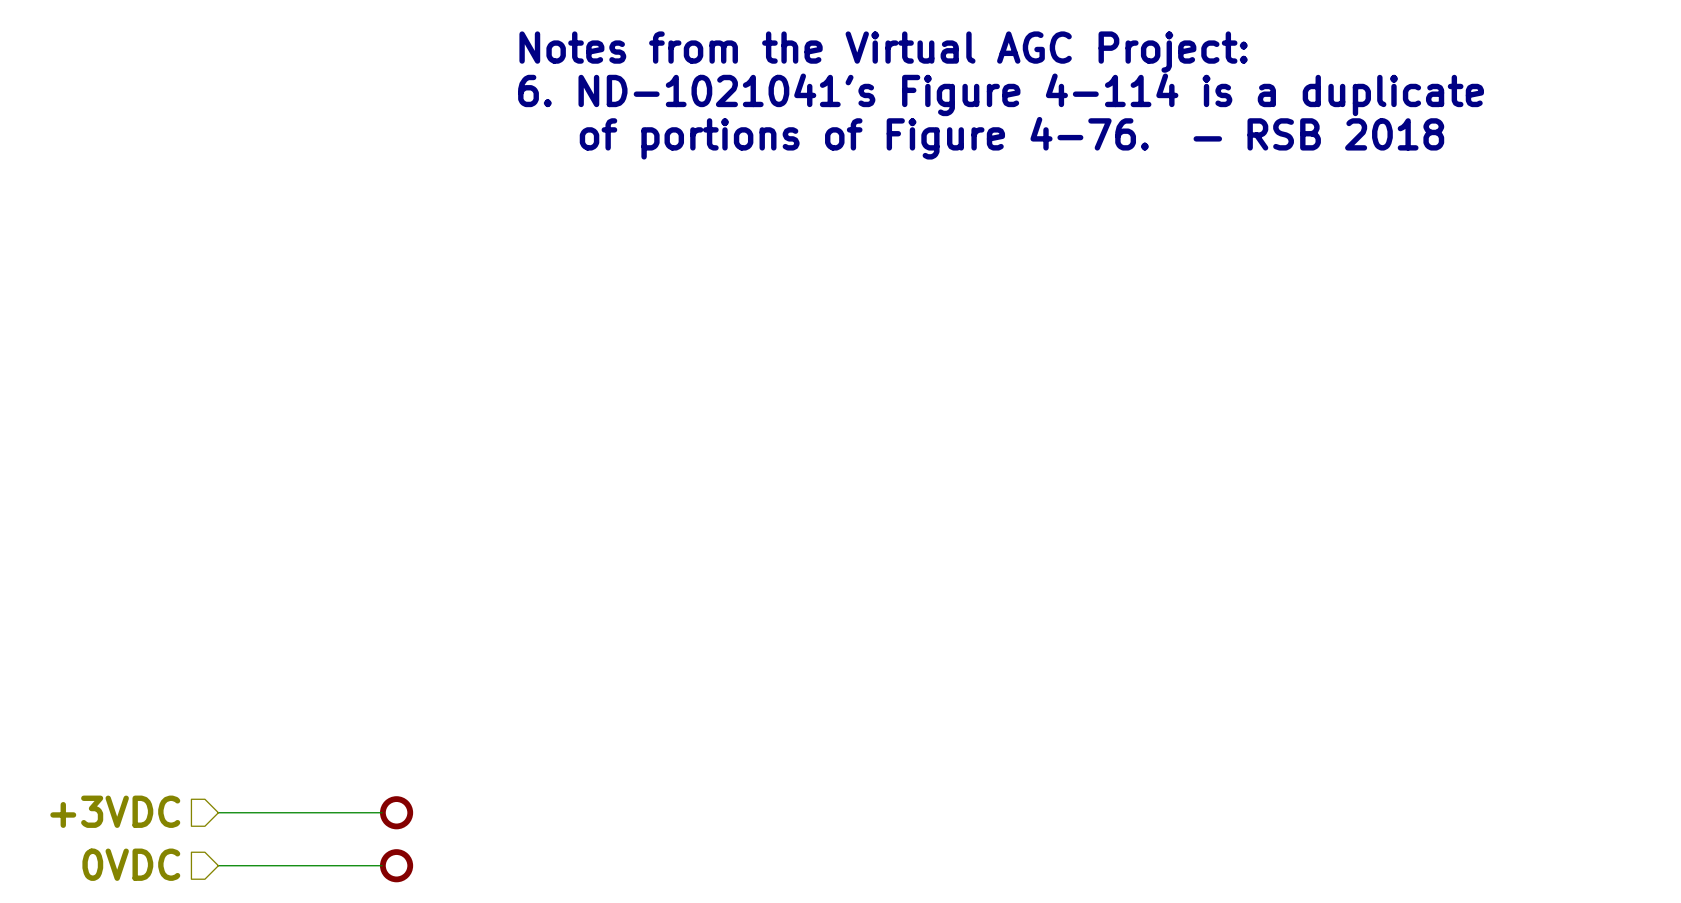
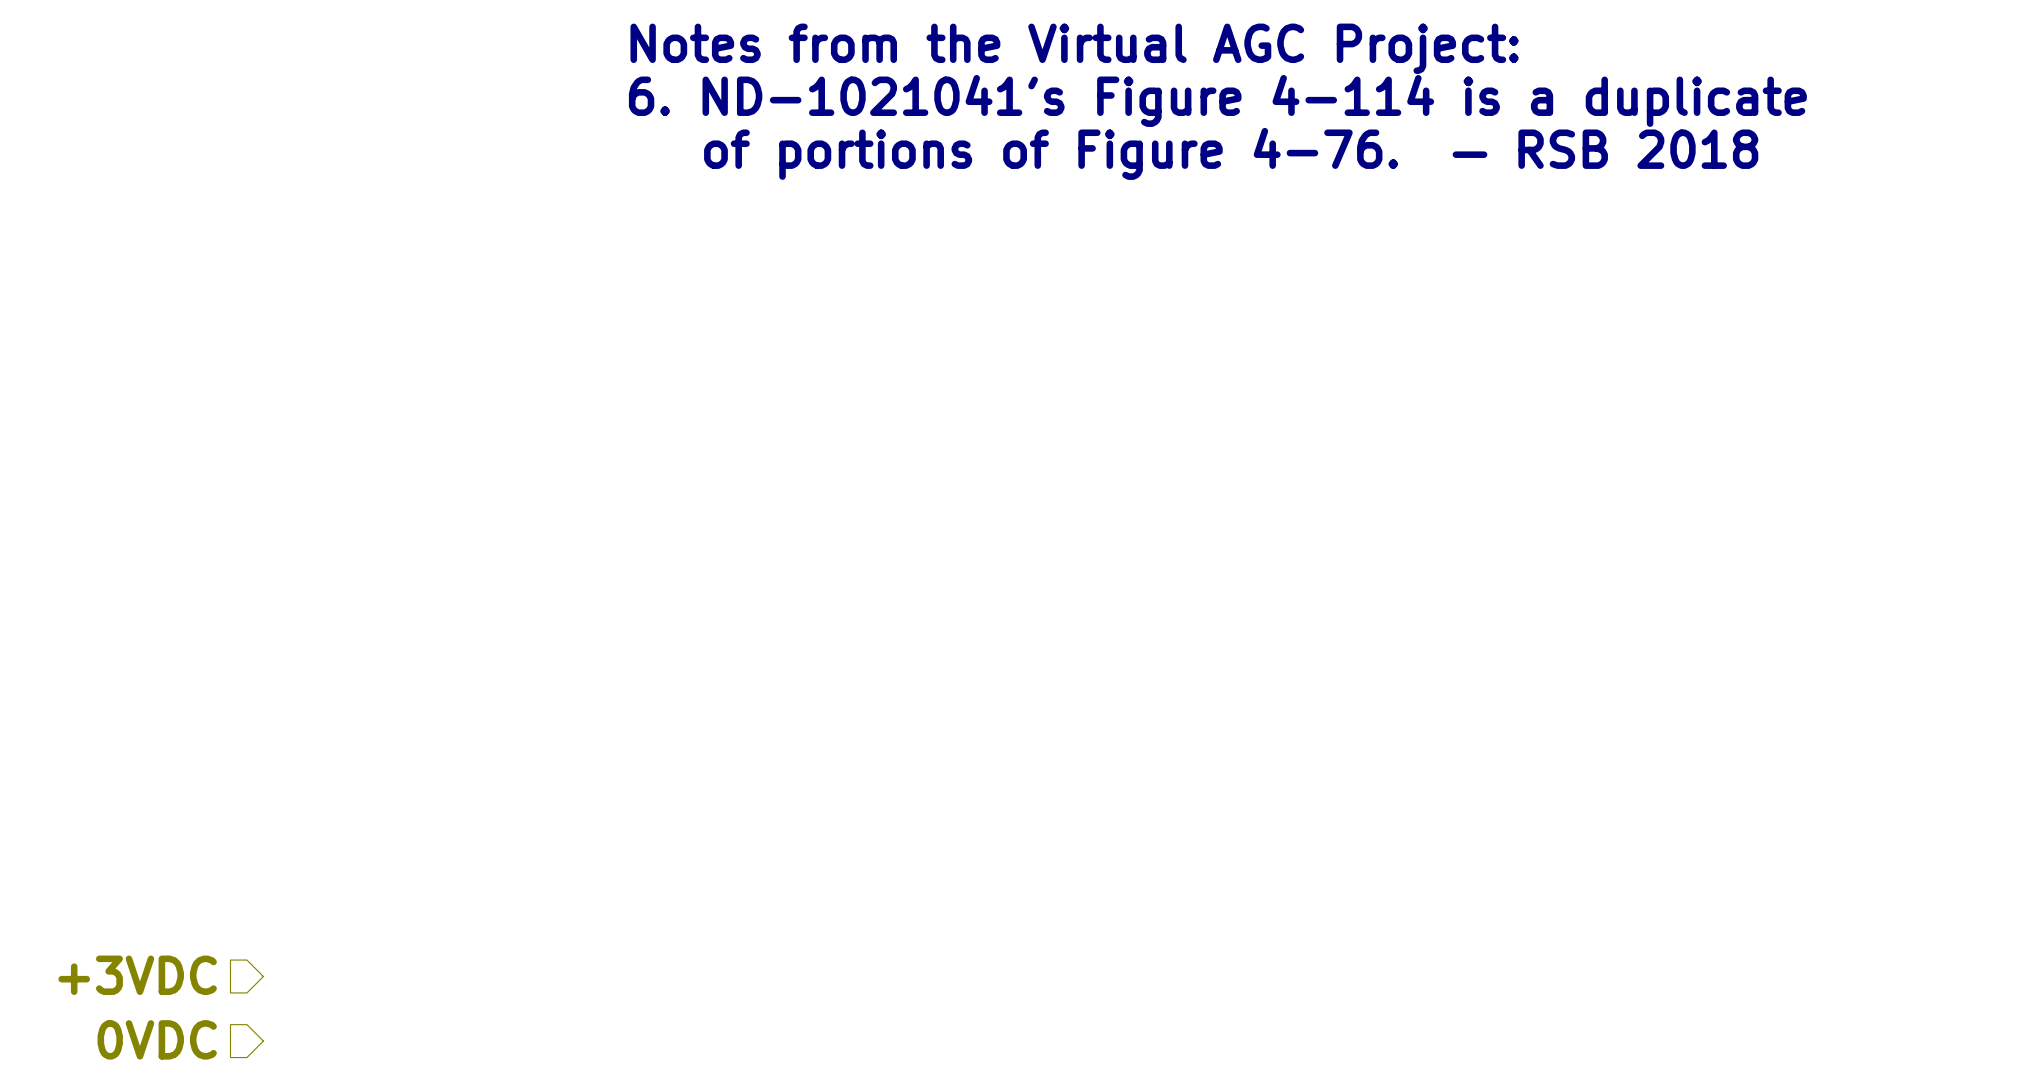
wire: (218, 812) (382, 812) -> none
part: (396, 812) -> none
wire: (218, 865) (382, 865) -> none
part: (396, 865) -> none

